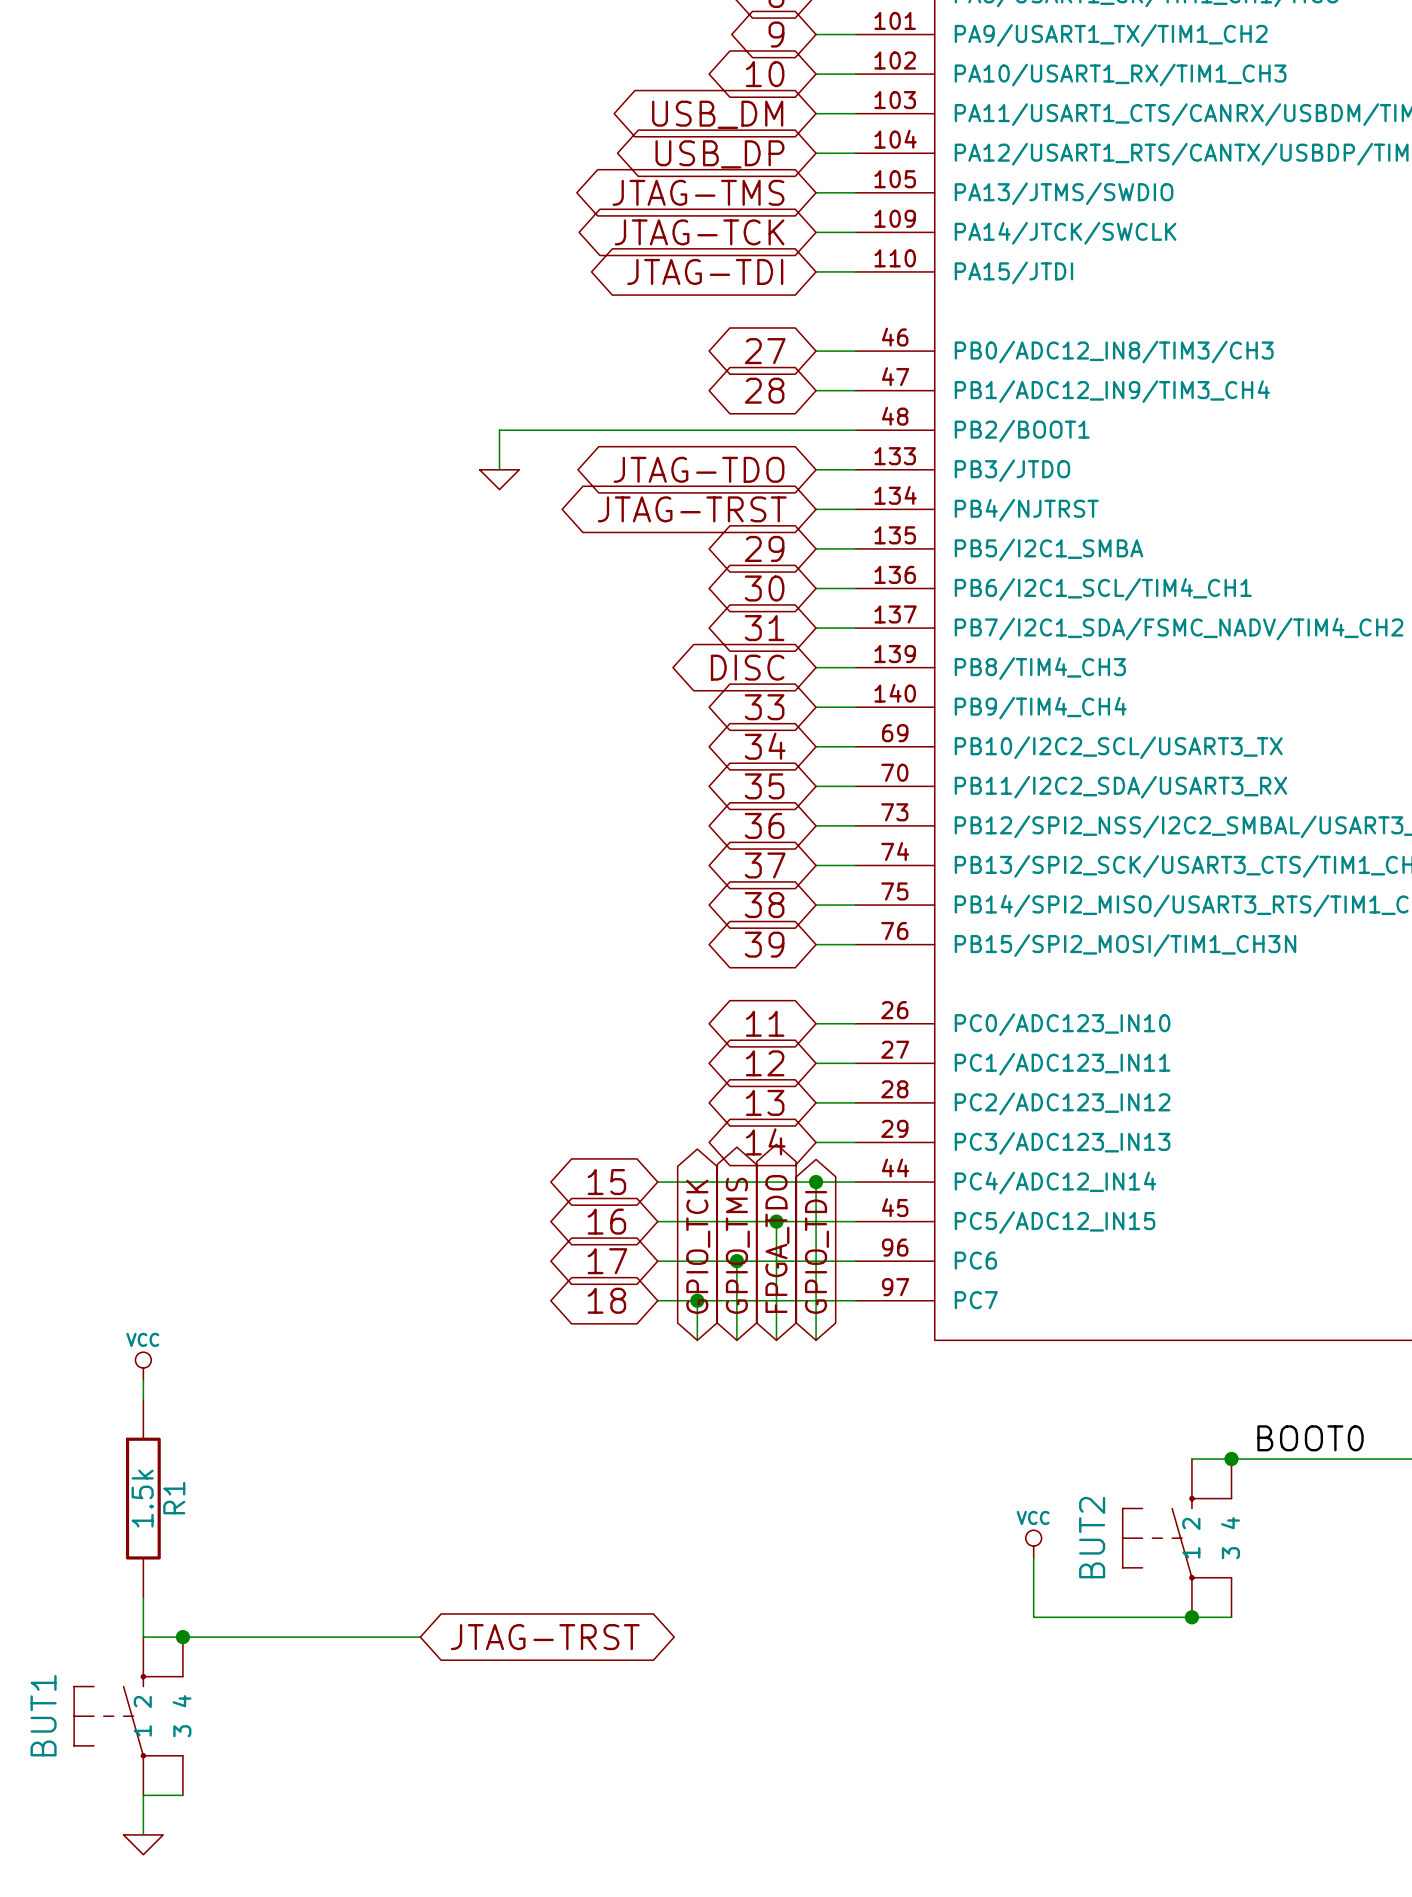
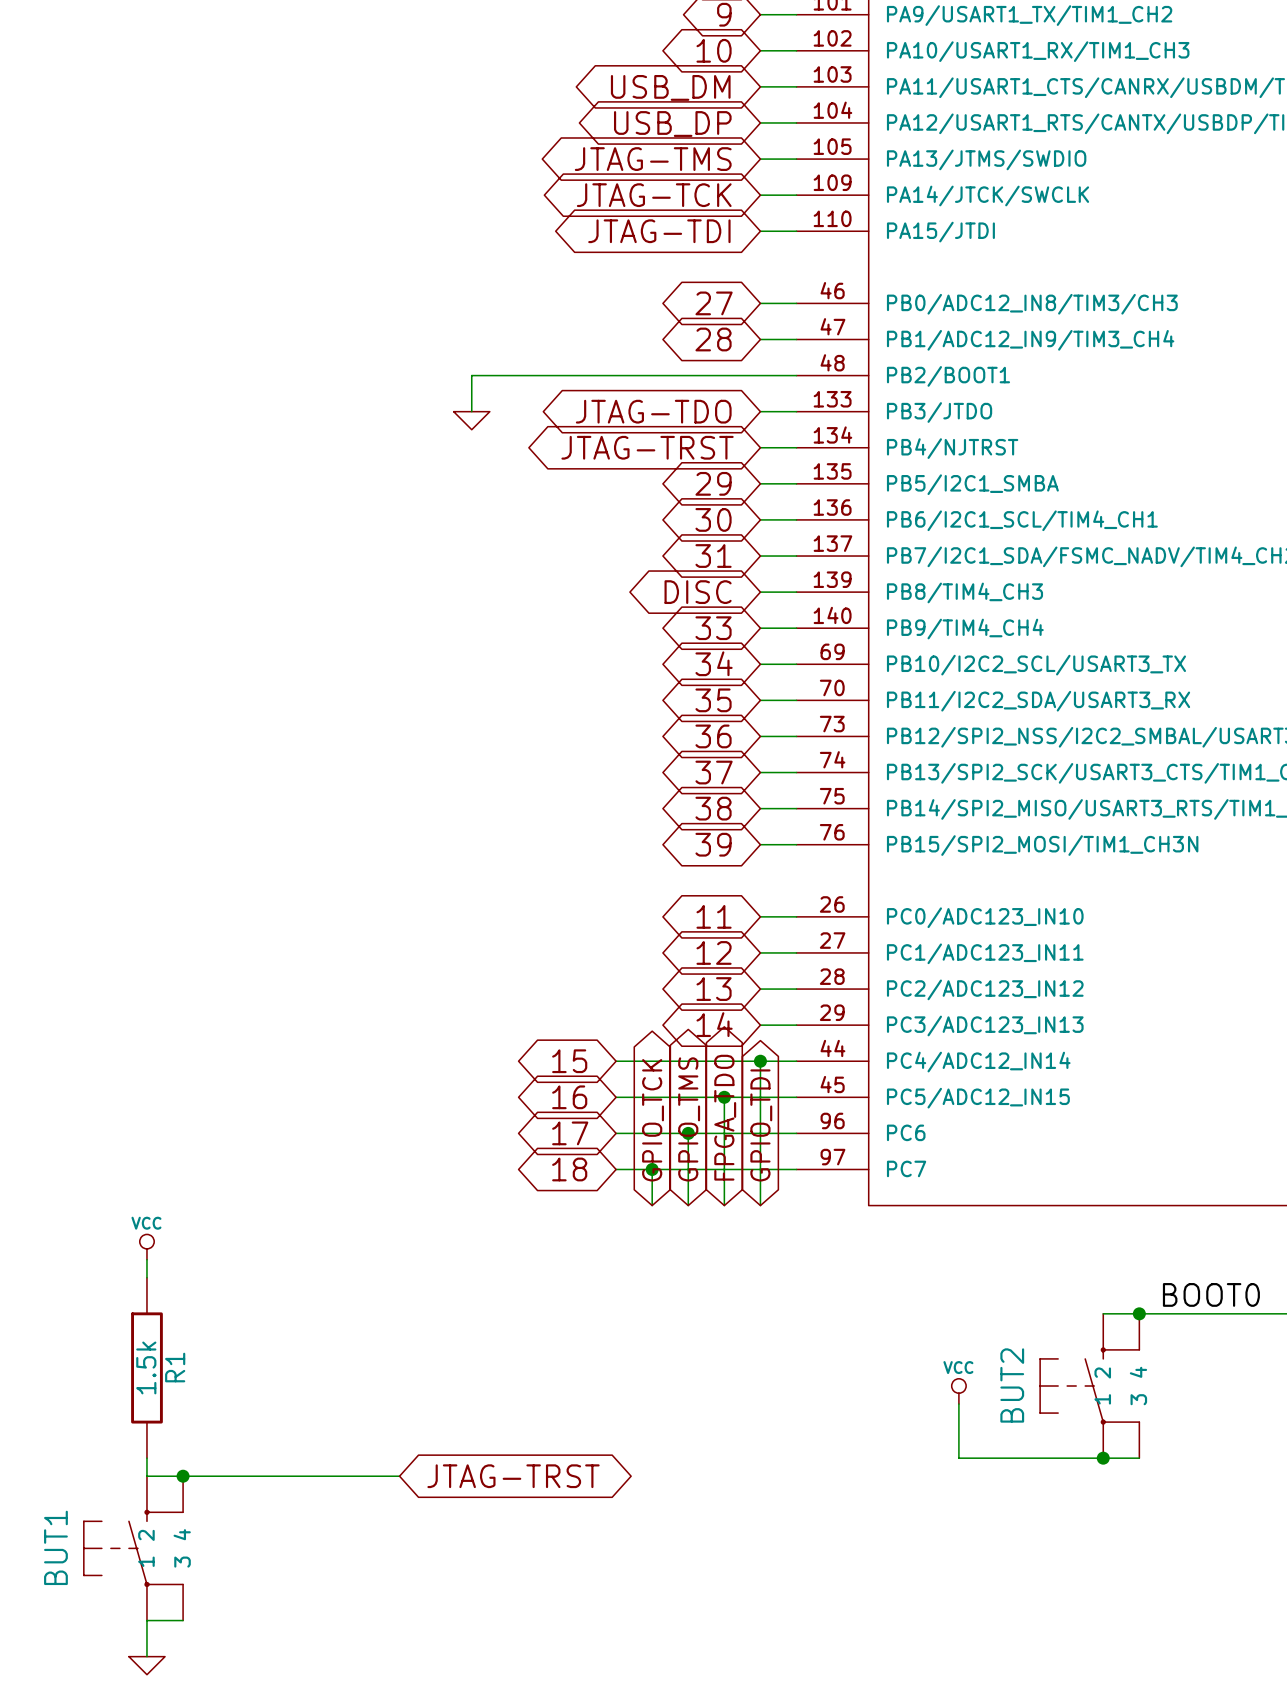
power symbol position: VCC (143, 1366) -> VCC (146, 1247)
R1 position: (143, 1498) -> (146, 1367)

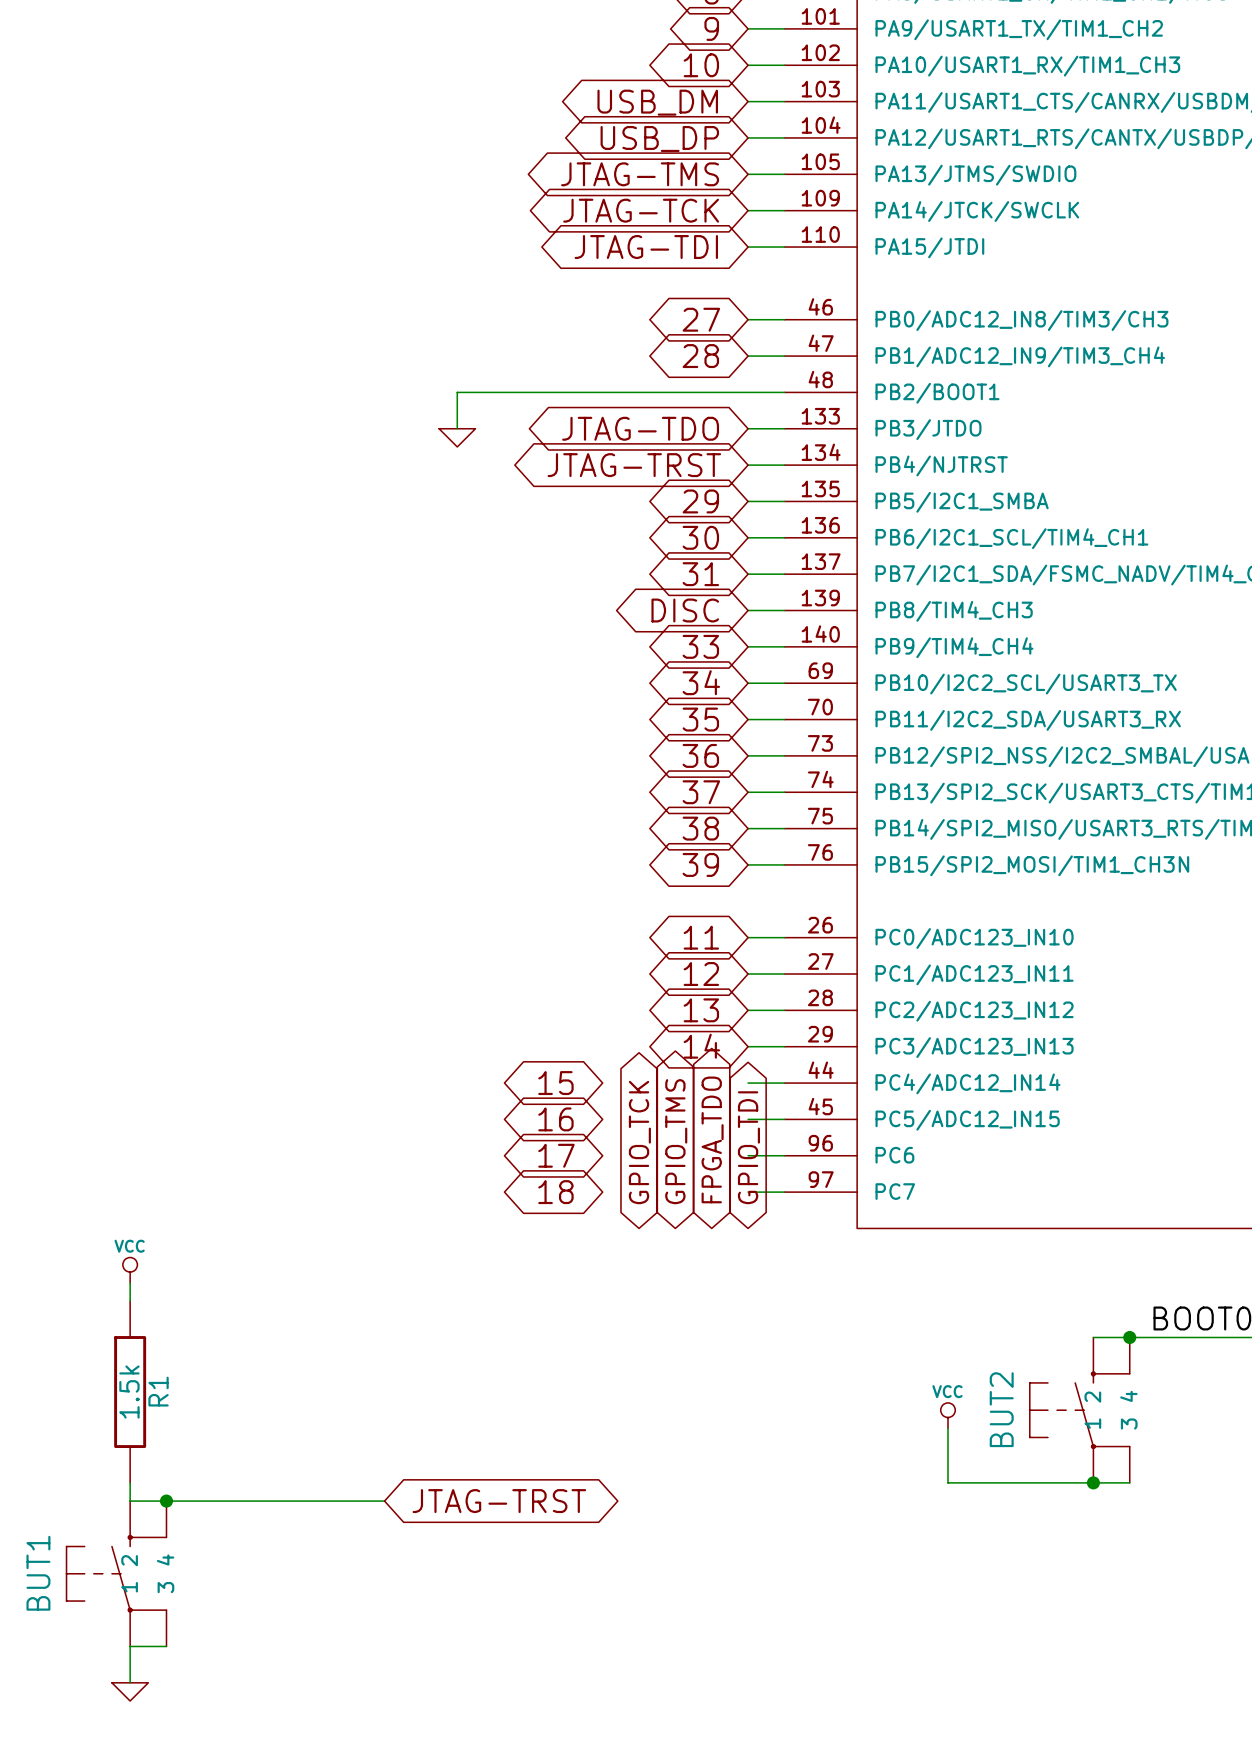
wire: (616, 1061) (760, 1061) (760, 1205) -> none
junction: (760, 1061) -> none
wire: (616, 1097) (760, 1097) -> none
wire: (724, 1097) (724, 1205) -> none
junction: (724, 1097) -> none
wire: (616, 1133) (760, 1133) -> none
wire: (688, 1133) (688, 1205) -> none
junction: (688, 1133) -> none
wire: (616, 1169) (760, 1169) -> none
wire: (652, 1169) (652, 1205) -> none
junction: (652, 1169) -> none

